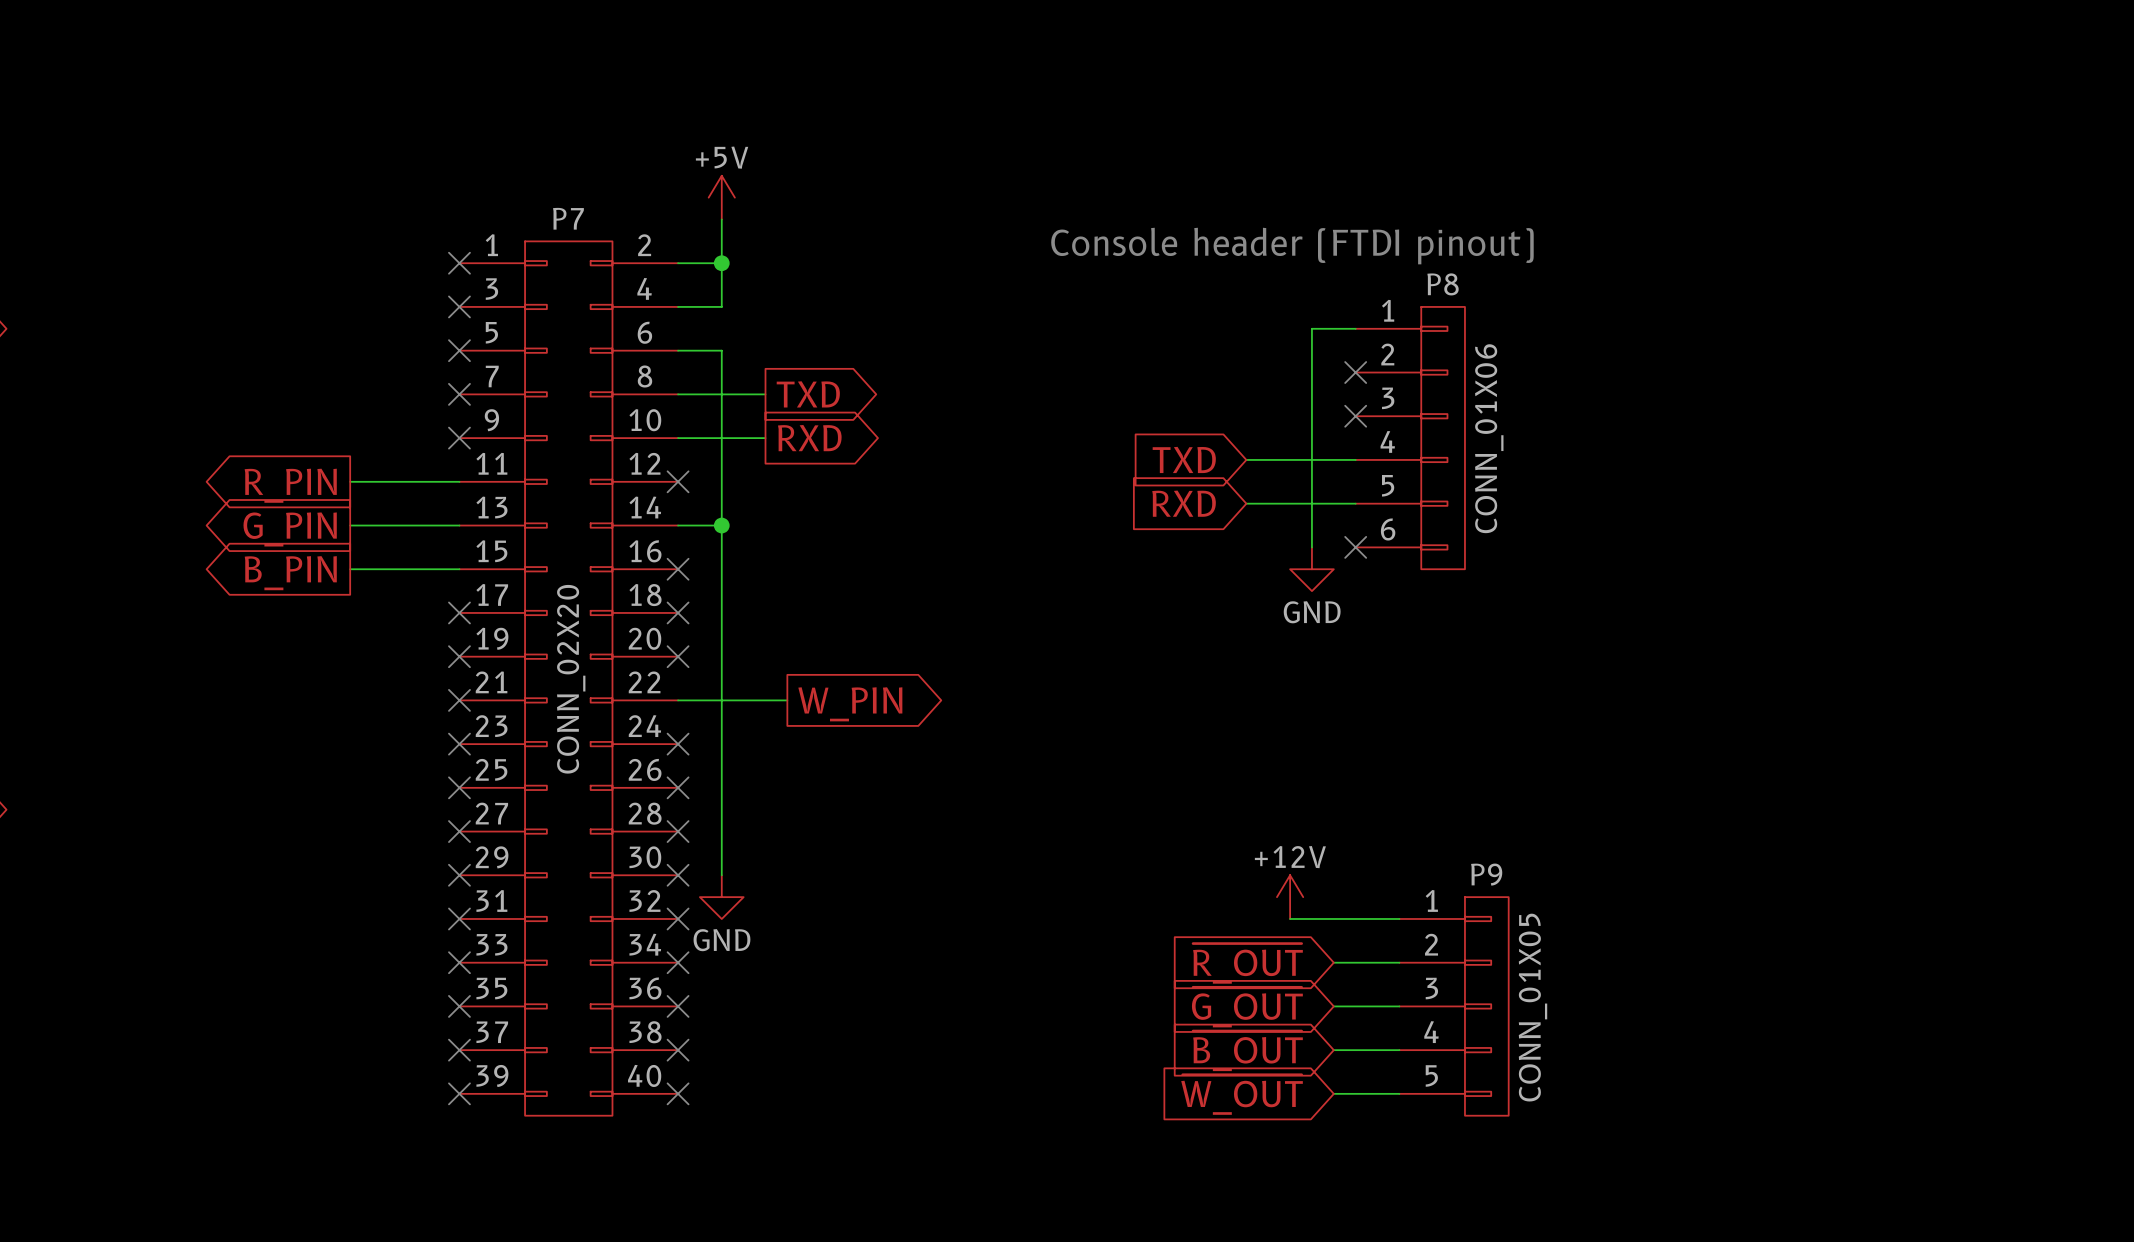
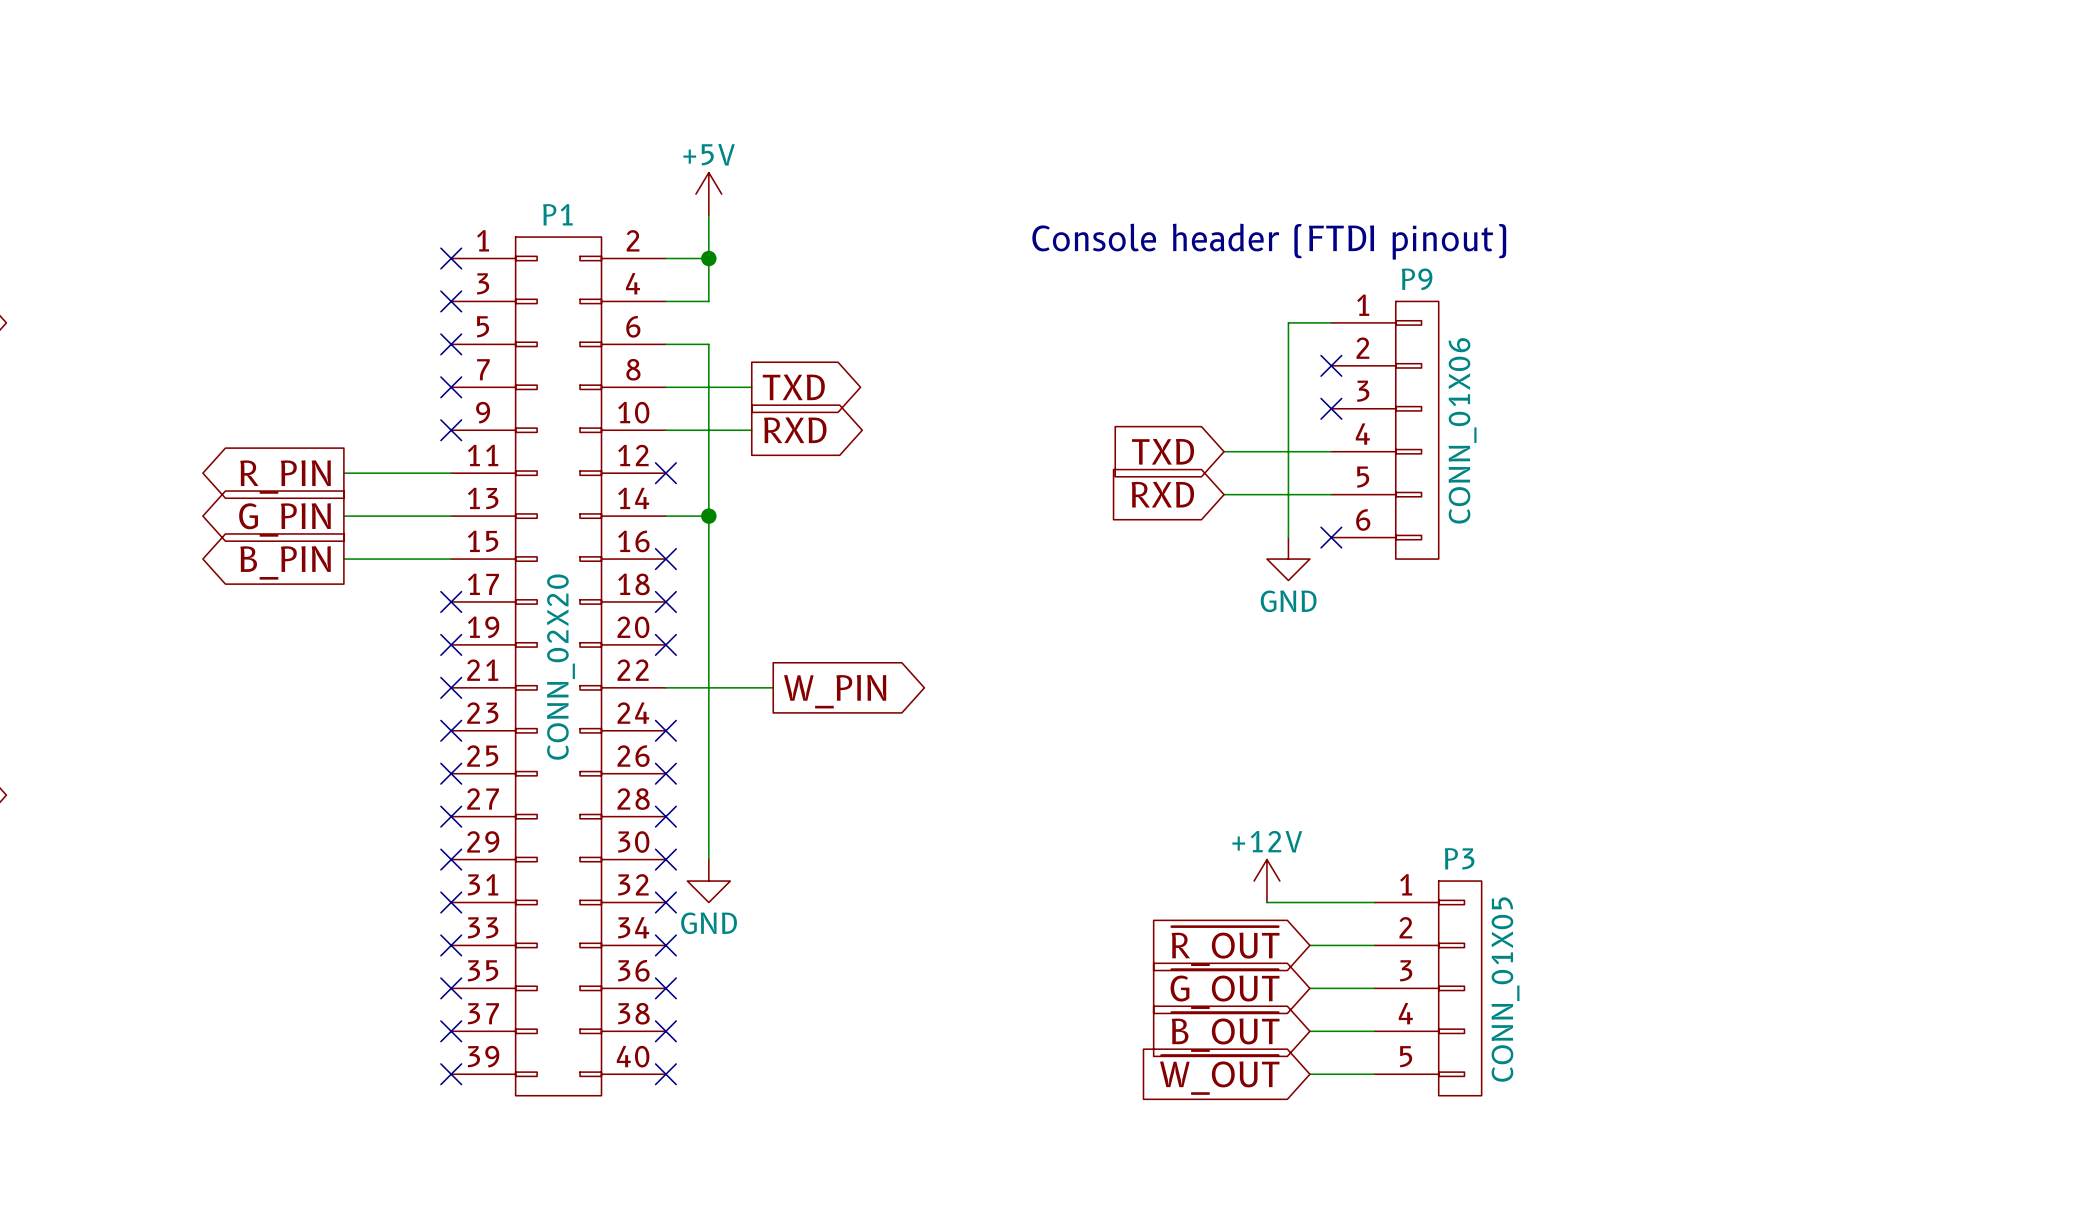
P7 name: P7 (568, 218) -> P1 (557, 214)
P8 name: P8 (1443, 284) -> P9 (1417, 279)
P9 name: P9 (1486, 874) -> P3 (1459, 858)

